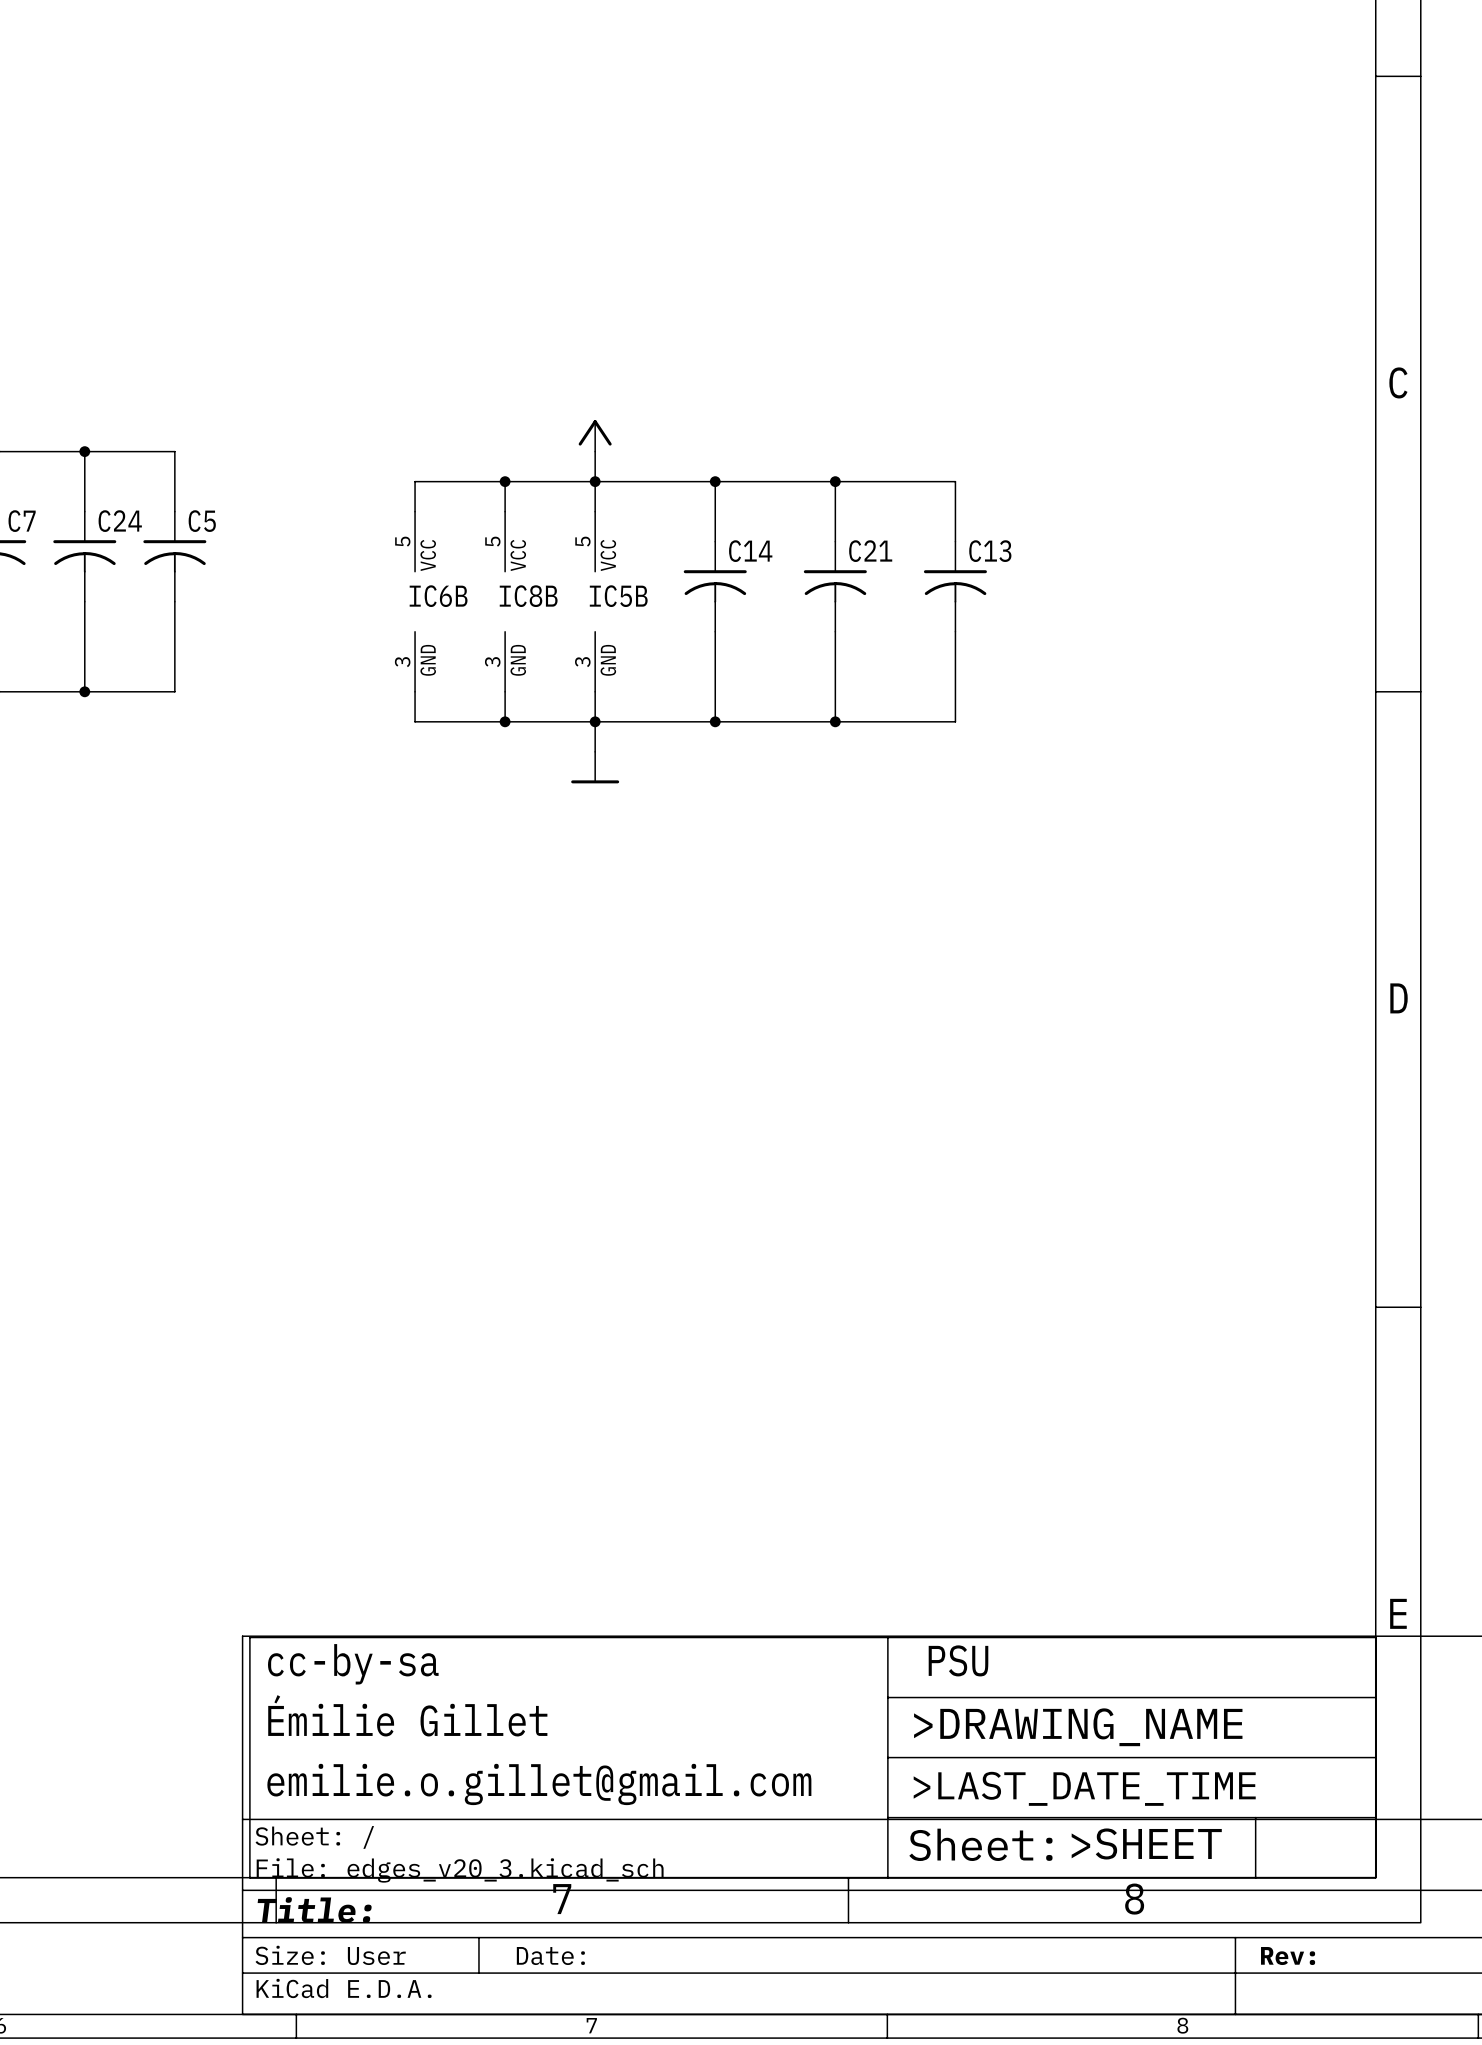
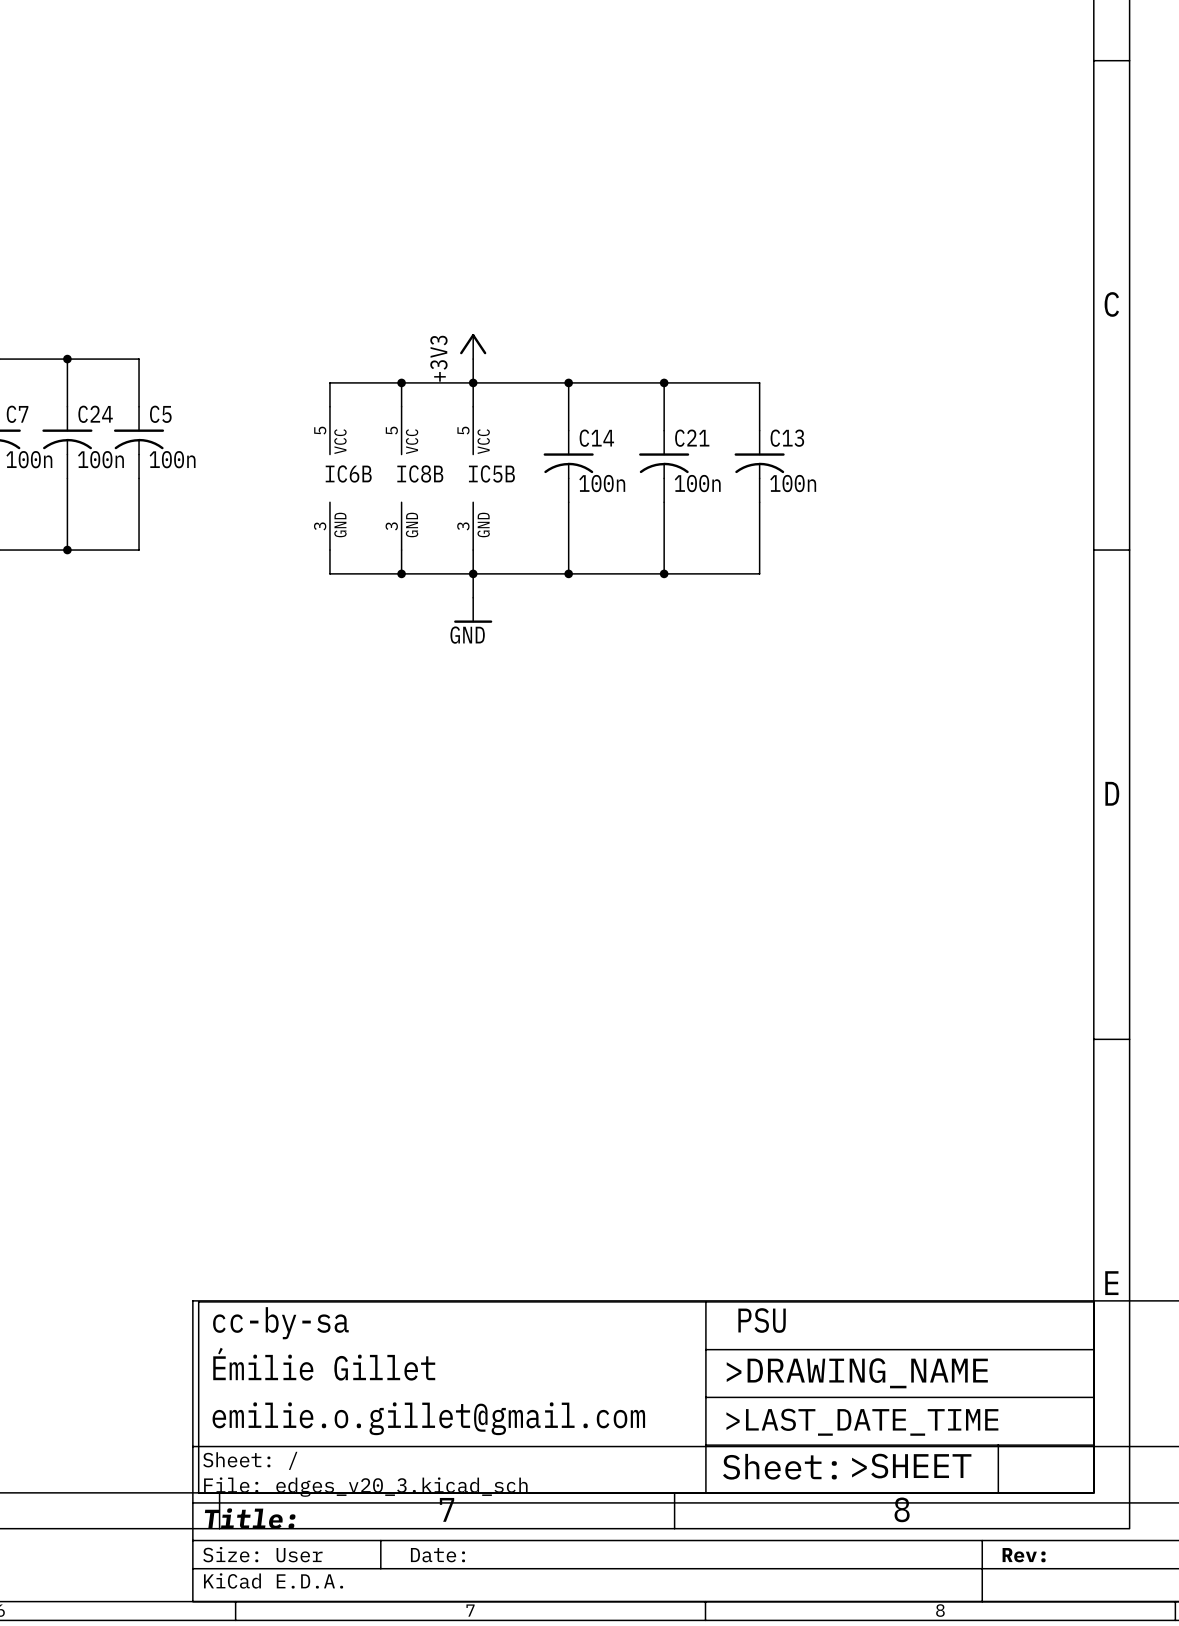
power symbol text: none -> +3V3 (438, 358)
C7 value: none -> 100n (29, 459)
C24 value: none -> 100n (100, 459)
C5 value: none -> 100n (172, 459)
C14 value: none -> 100n (602, 483)
C21 value: none -> 100n (697, 483)
C13 value: none -> 100n (793, 483)
power symbol text: none -> GND (467, 635)

